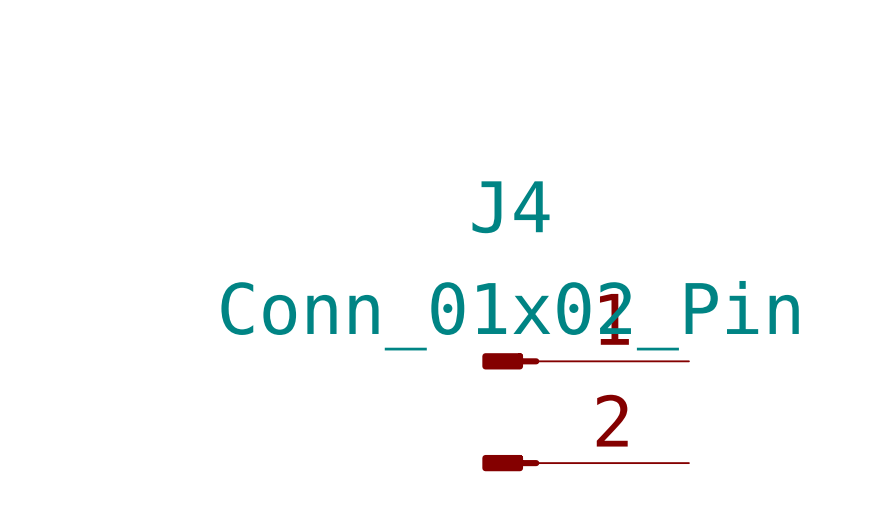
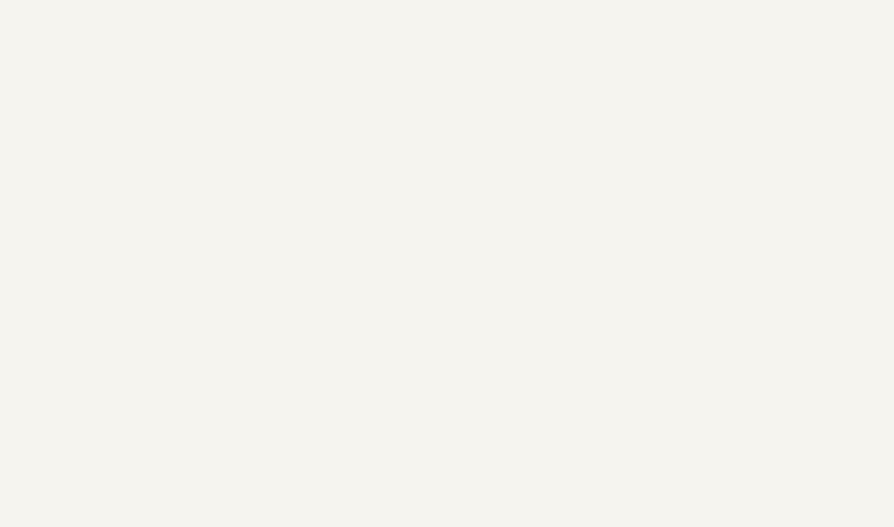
J4: Conn_01x02_Pin (585, 412) -> none

